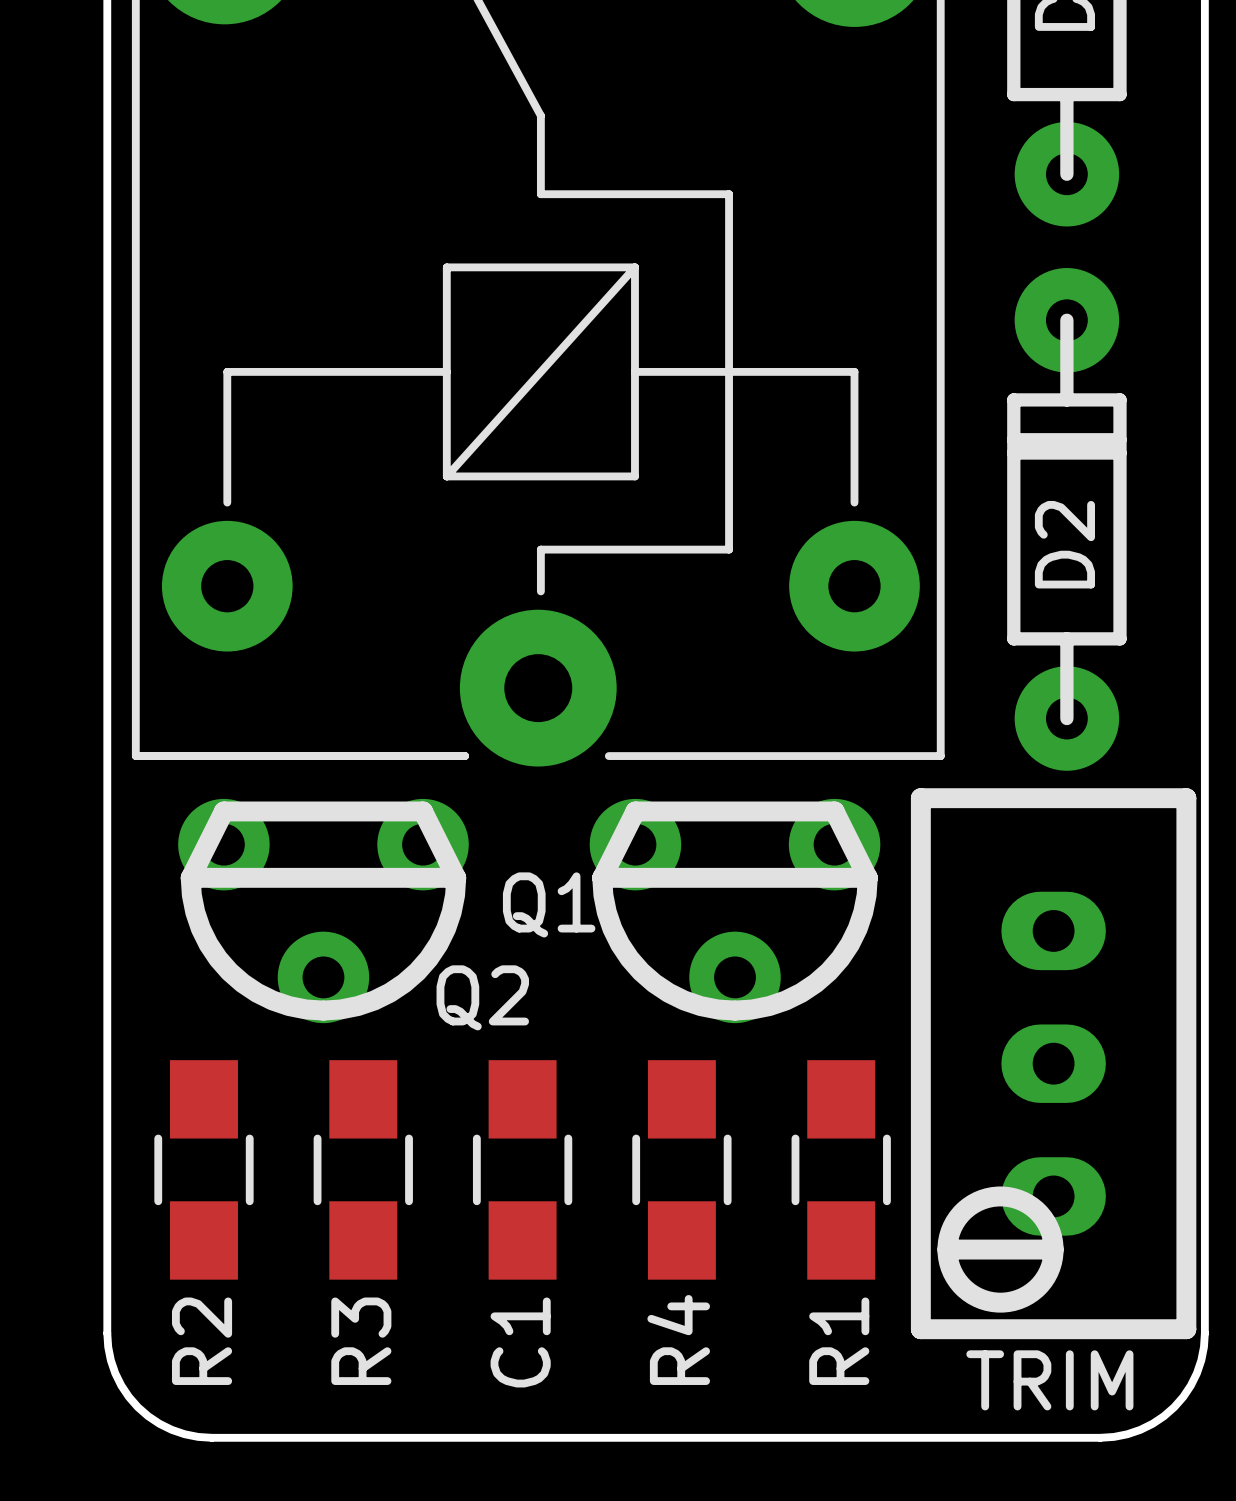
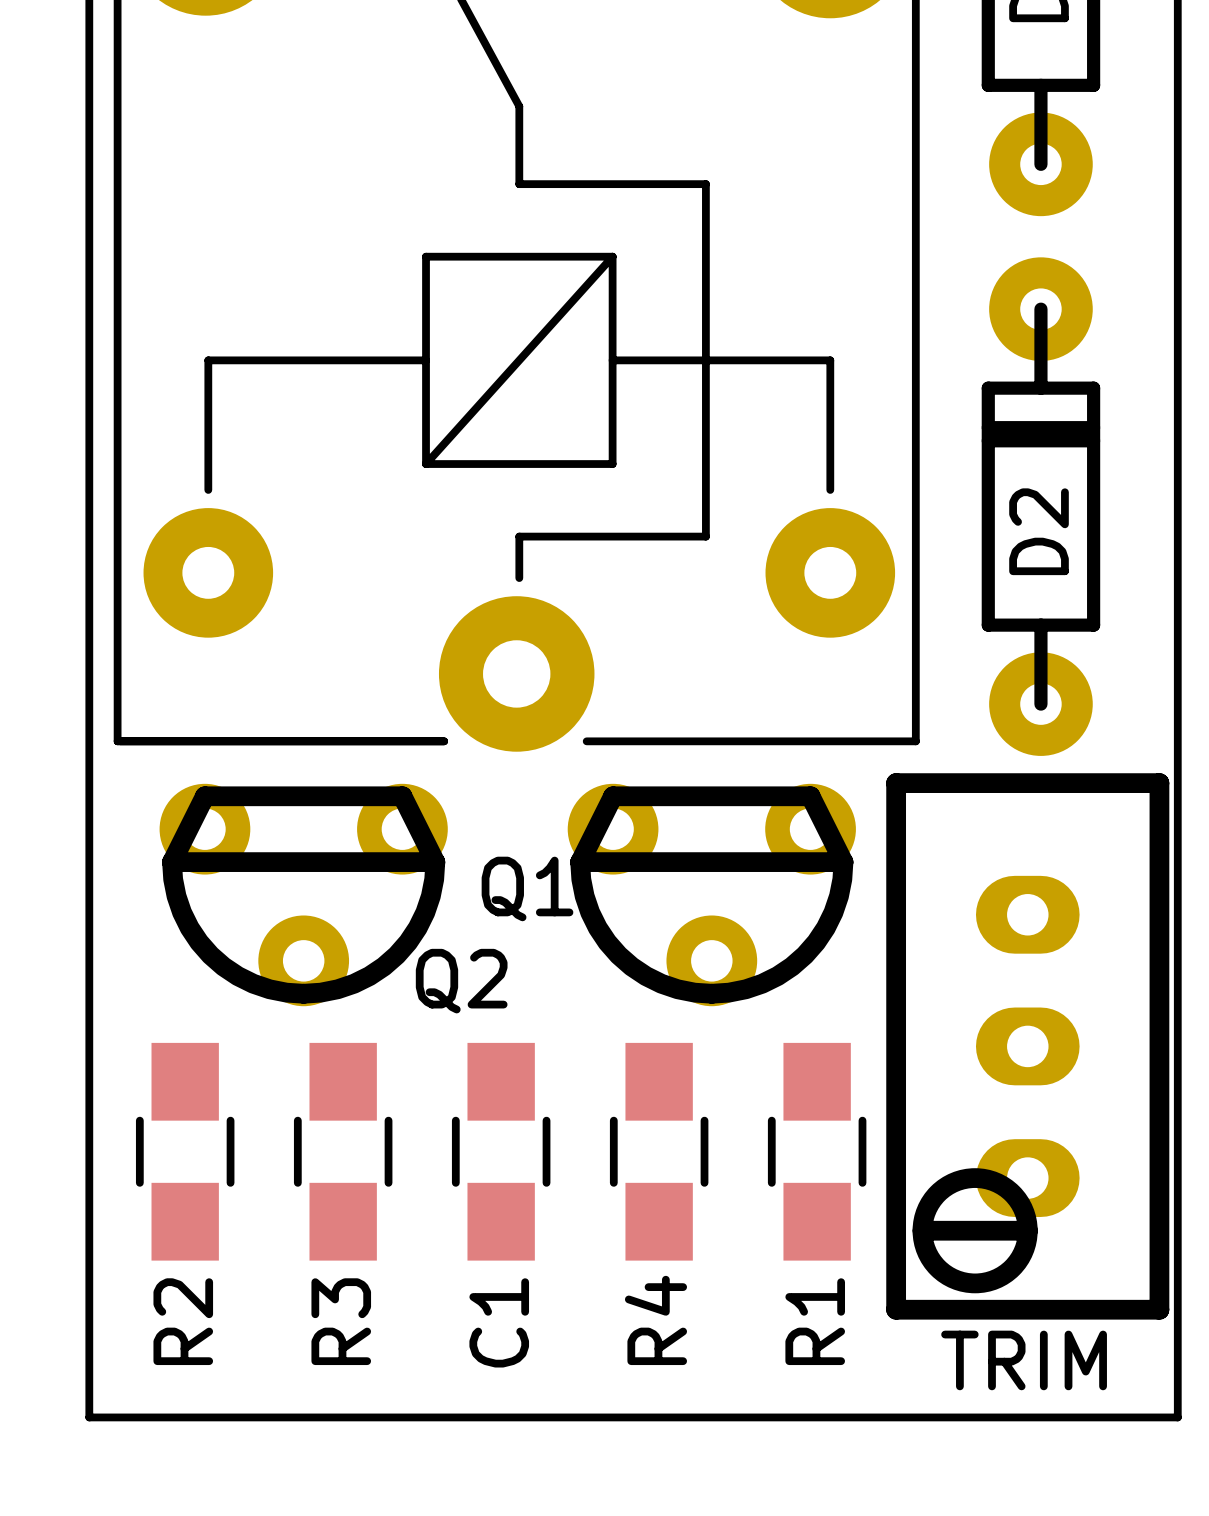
board edge: (107, 1333) (108, 1346) (115, 1373) (128, 1396) (137, 1407) (159, 1423) (171, 1429) (184, 1434) (211, 1437) -> (89, 1313) (89, 1417) (192, 1417)
board edge: (1204, 1333) (1203, 1346) (1196, 1373) (1183, 1396) (1174, 1407) (1152, 1423) (1140, 1429) (1127, 1434) (1100, 1437) -> (1177, 1313) (1177, 1417) (1074, 1417)

